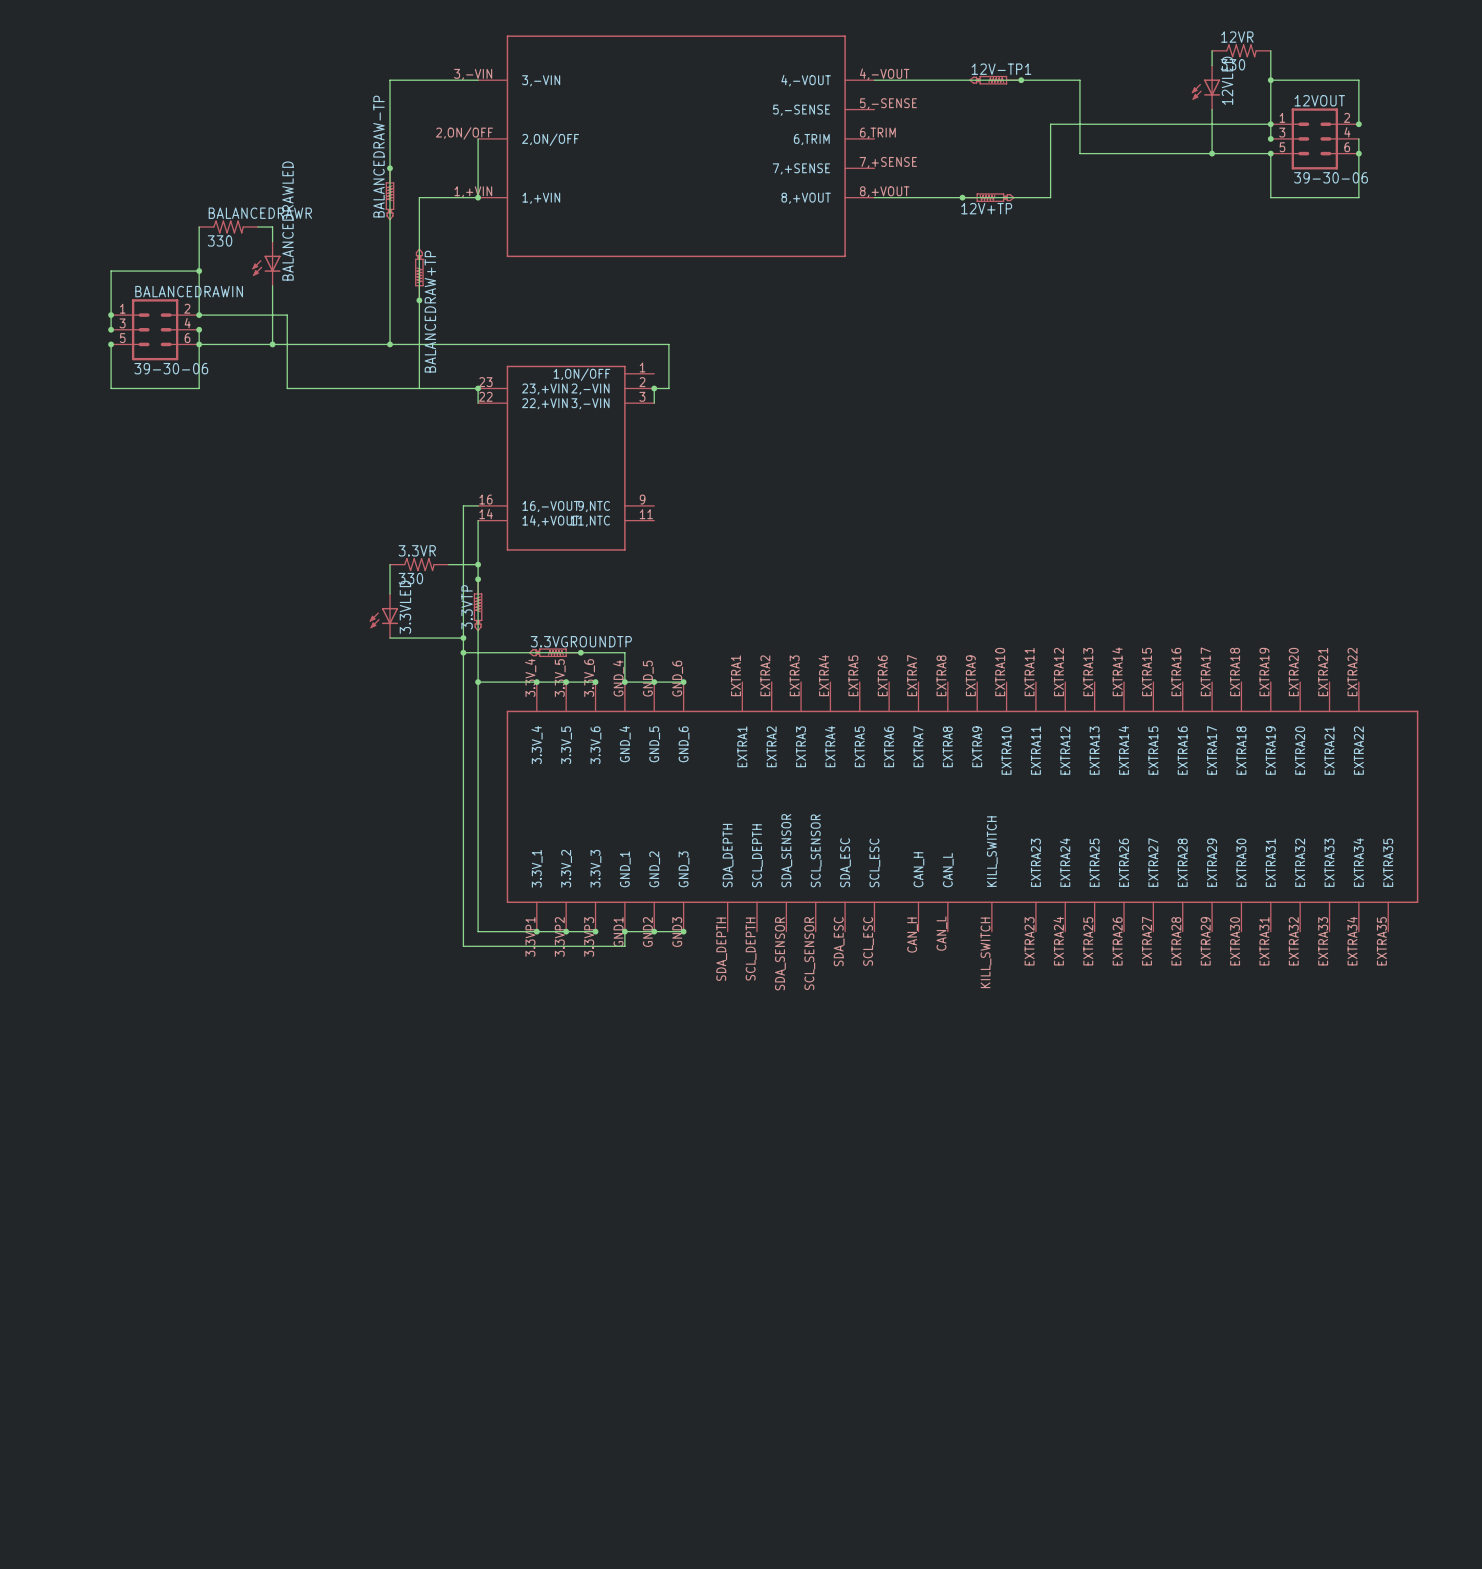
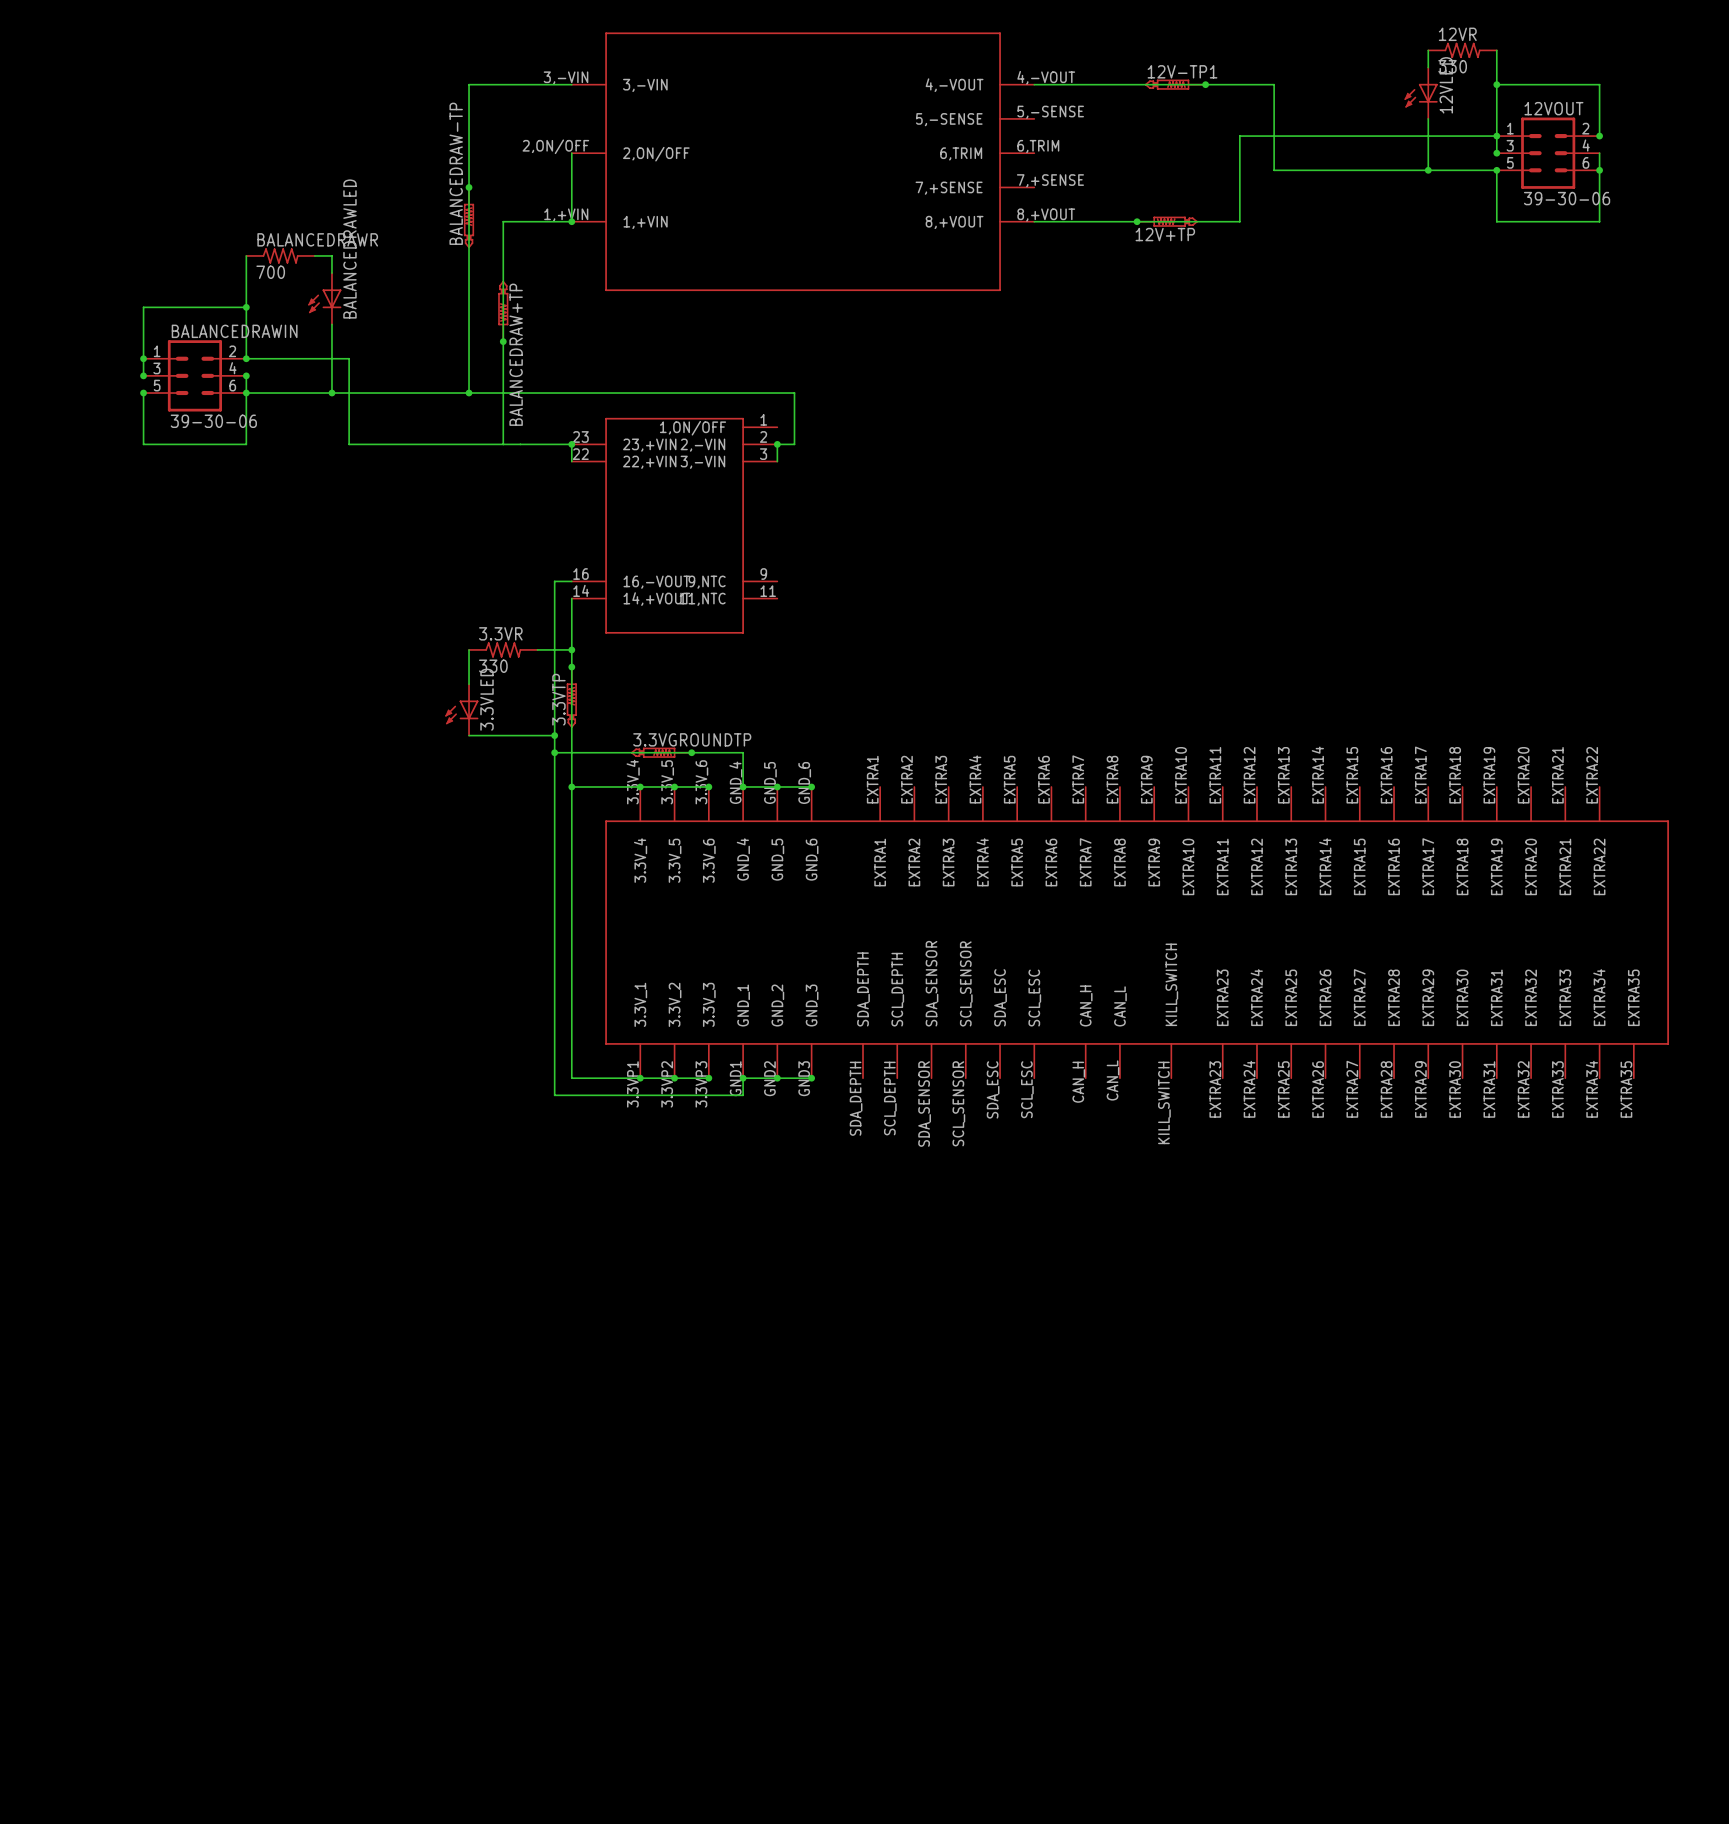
BALANCEDRAWR value: 330 (220, 240) -> 700 (270, 272)

